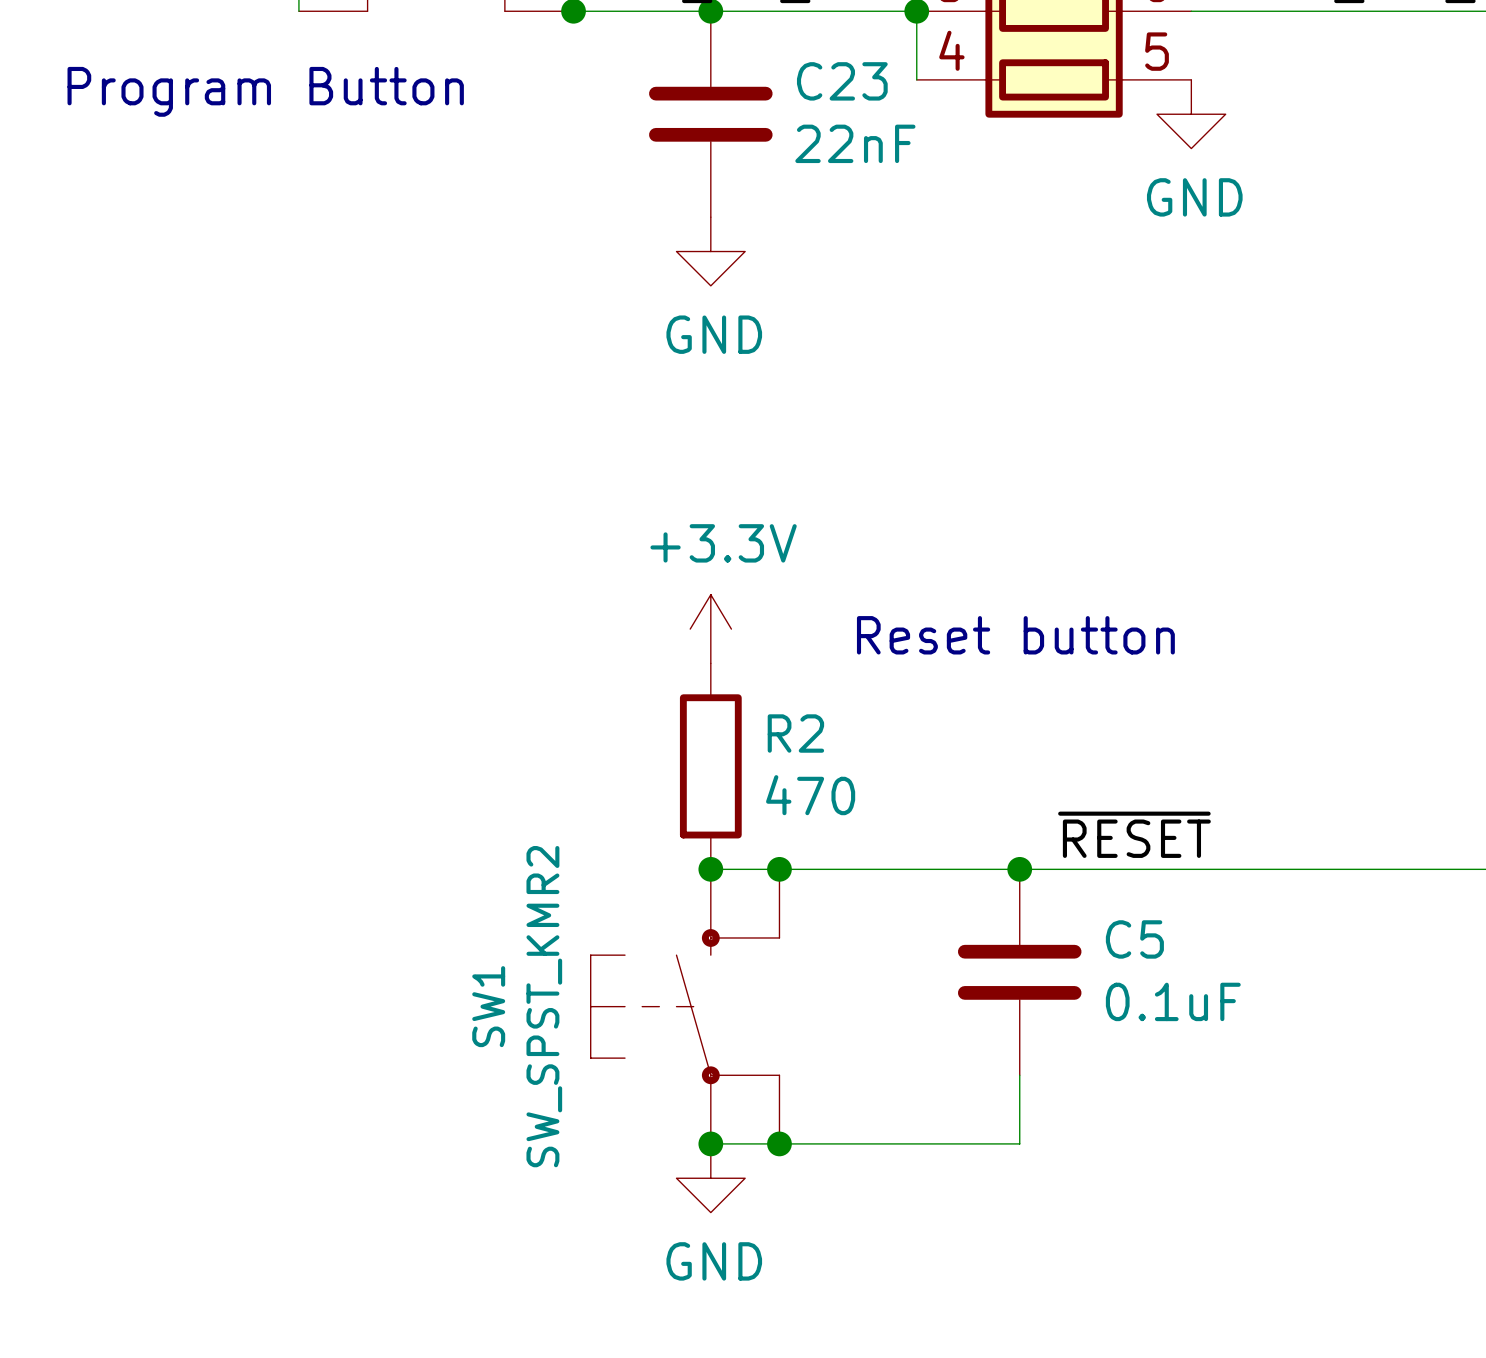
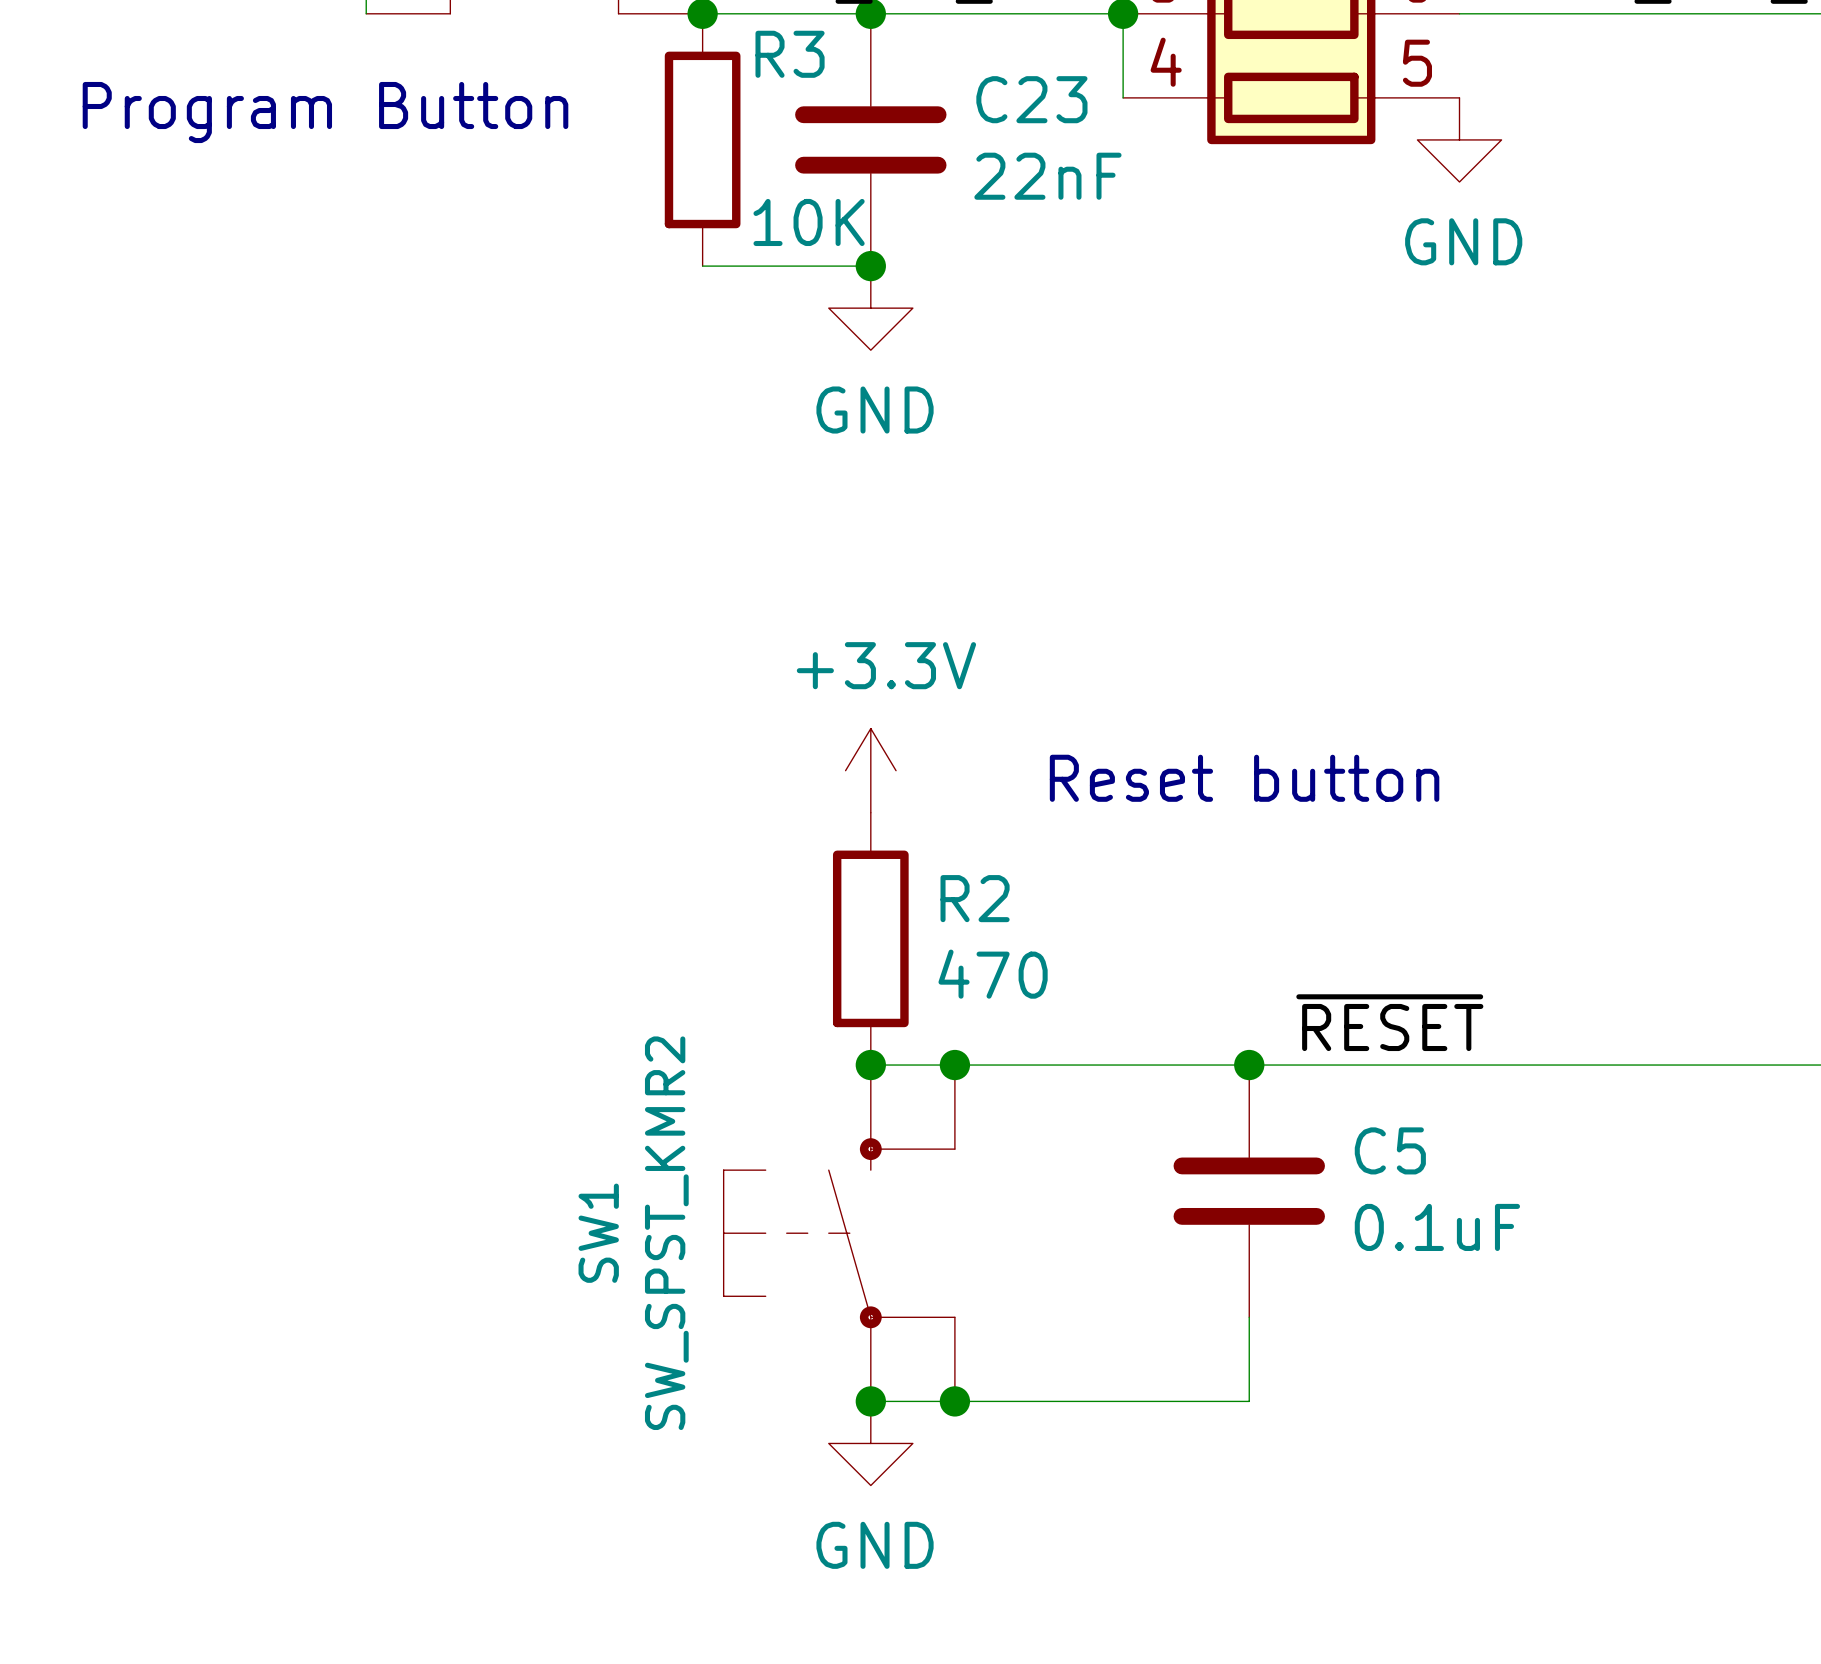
R3: none -> 10K (702, 139)
wire: none -> (702, 266) (870, 266)
junction: none -> (870, 266)

